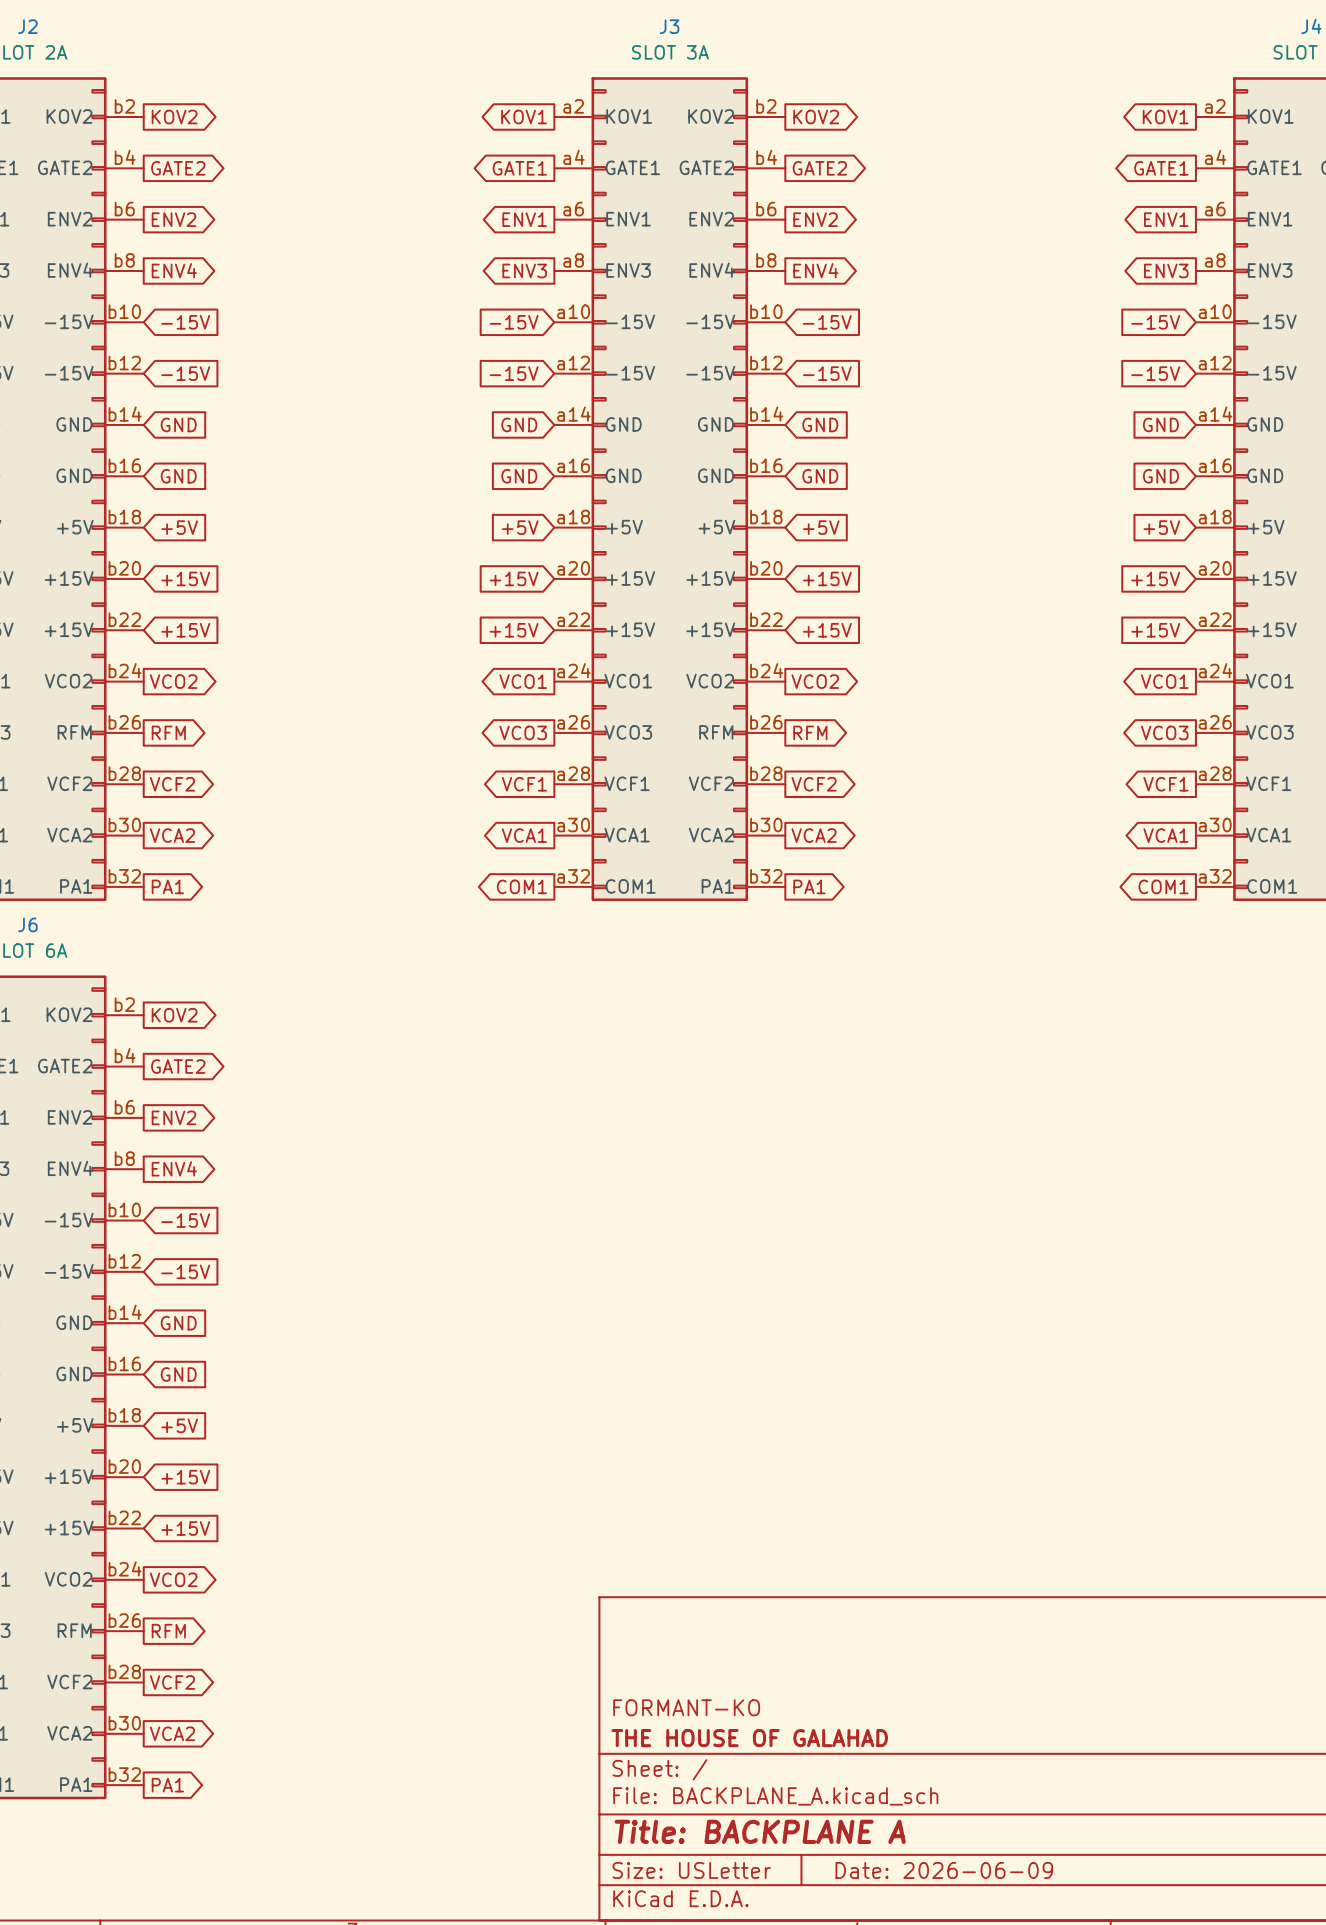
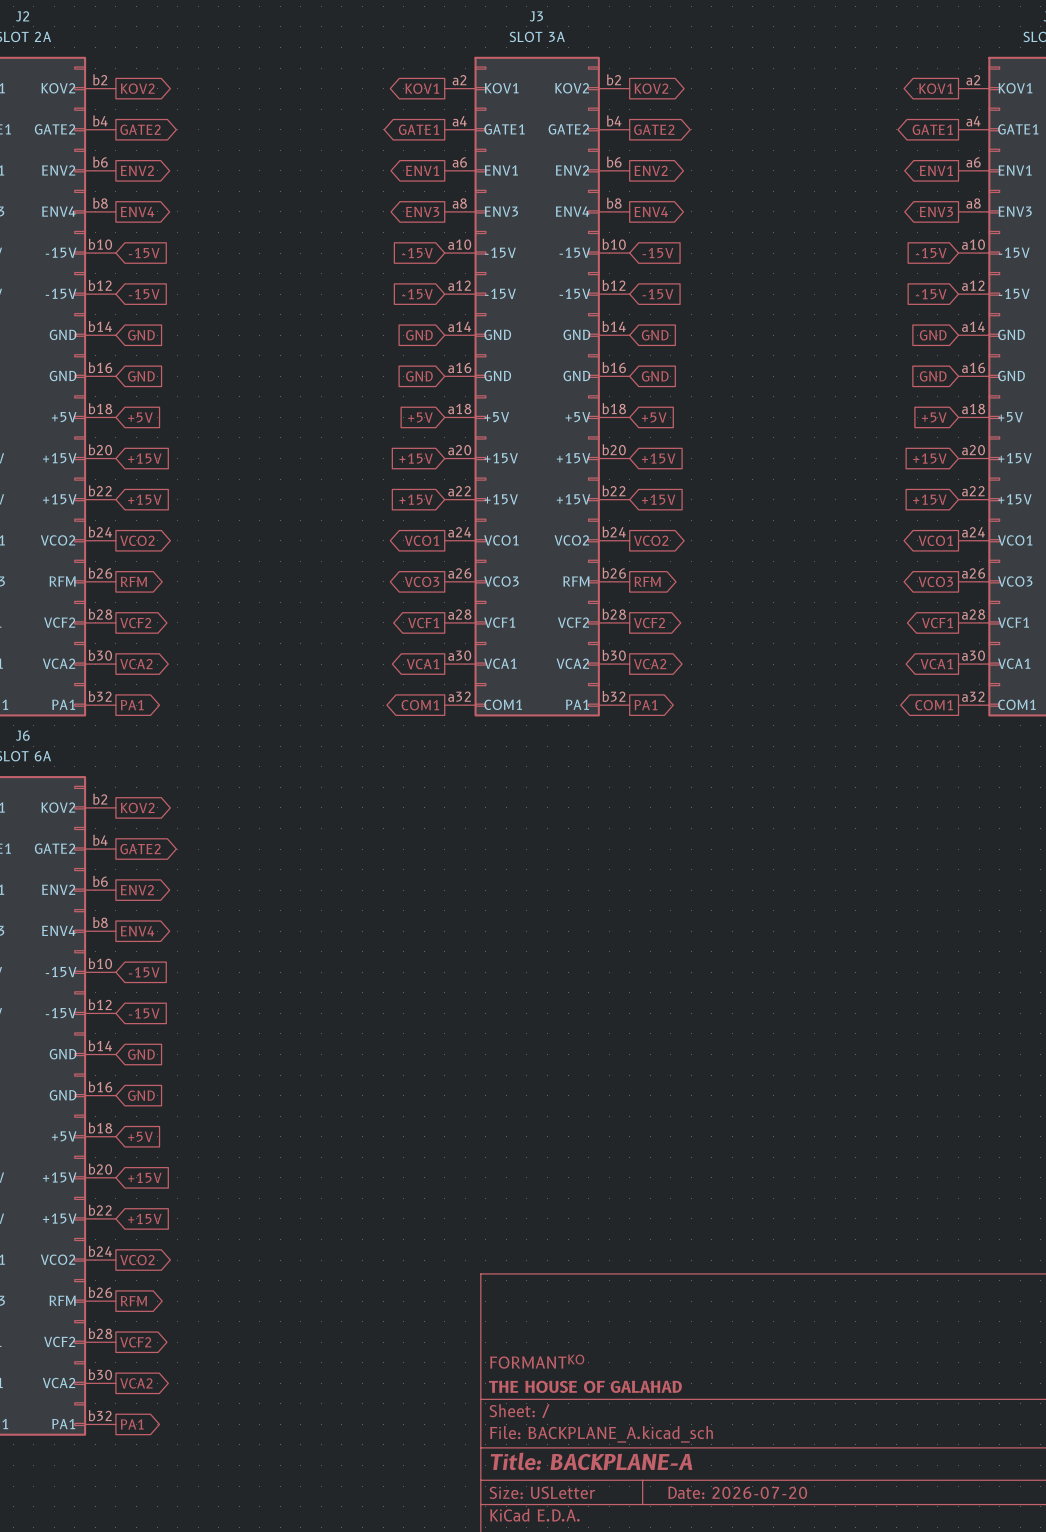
title block: FORMANT-KO (686, 1707) -> FORMANTKO (537, 1361)
title block: Title: BACKPLANE A (760, 1831) -> Title: BACKPLANE-A (591, 1461)
title block: Date: 2026-06-09 (944, 1870) -> Date: 2026-07-20 (737, 1492)

